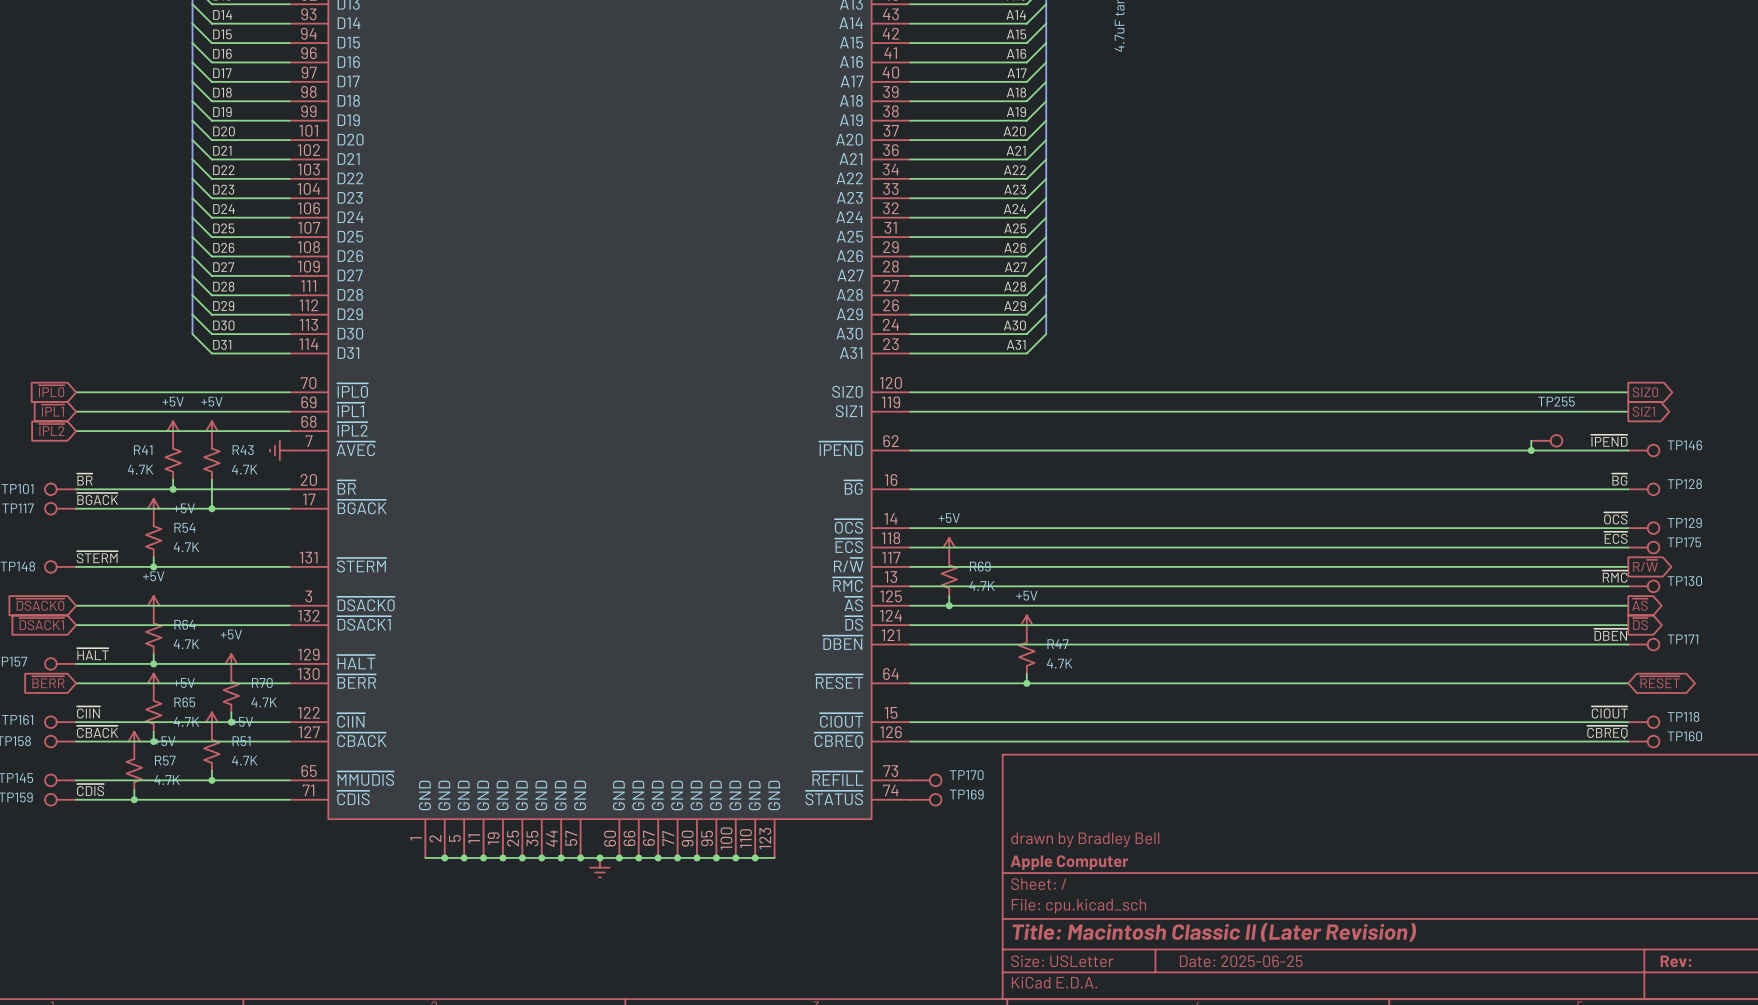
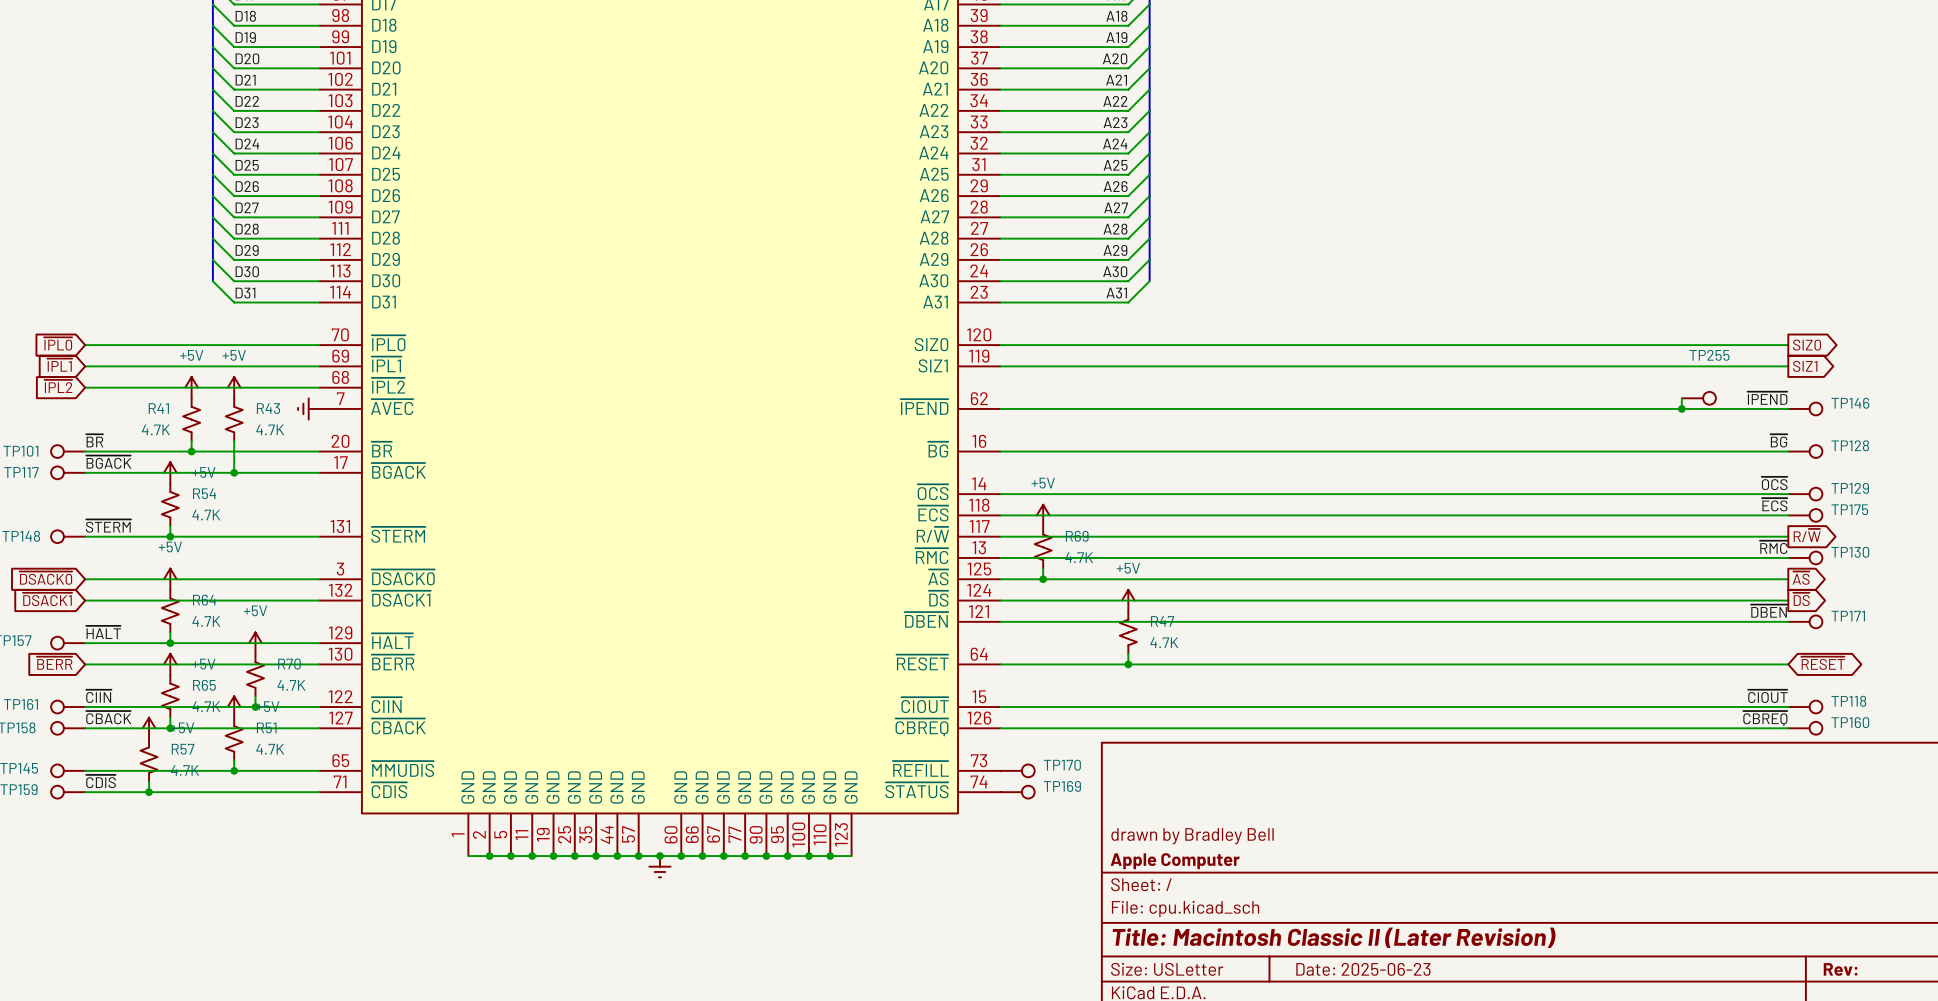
title block: Date: 2025-06-25 (1241, 961) -> Date: 2025-06-23 (1363, 969)

